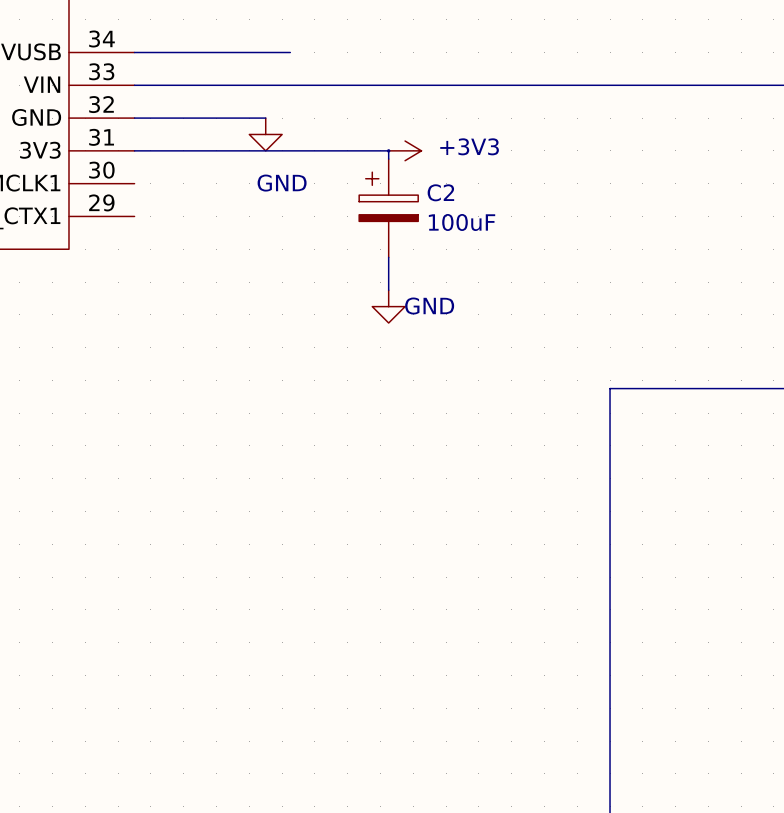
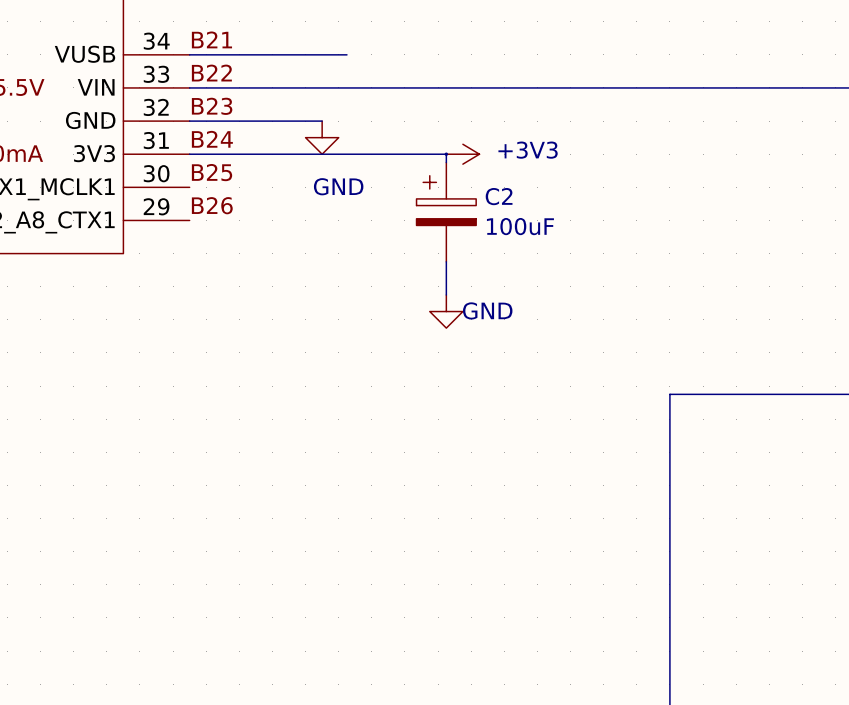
label: none -> B21 (211, 39)
label: none -> B22 (211, 73)
label: none -> B23 (212, 106)
label: none -> B24 (212, 139)
label: none -> B25 (212, 172)
label: none -> B26 (212, 205)

